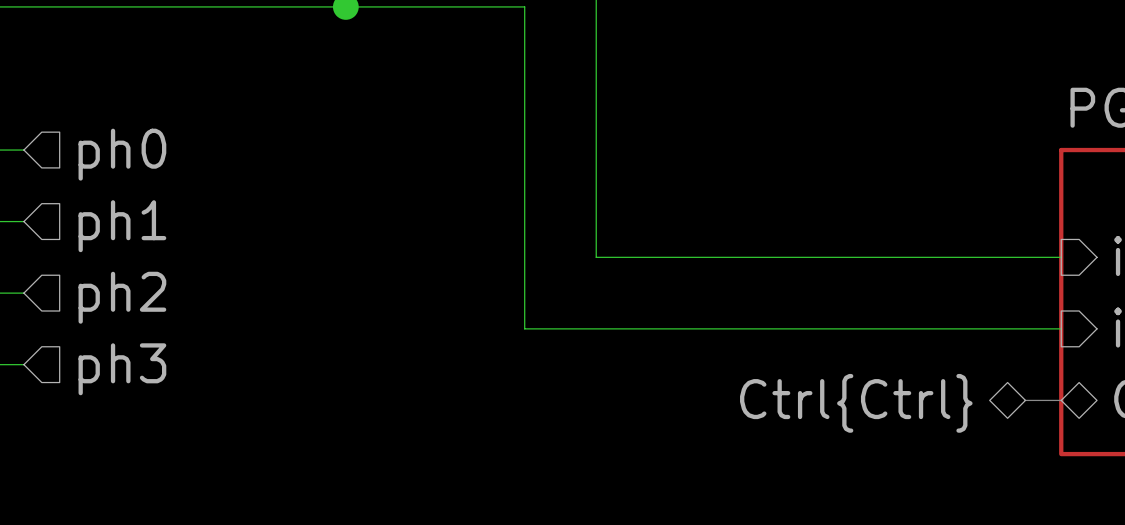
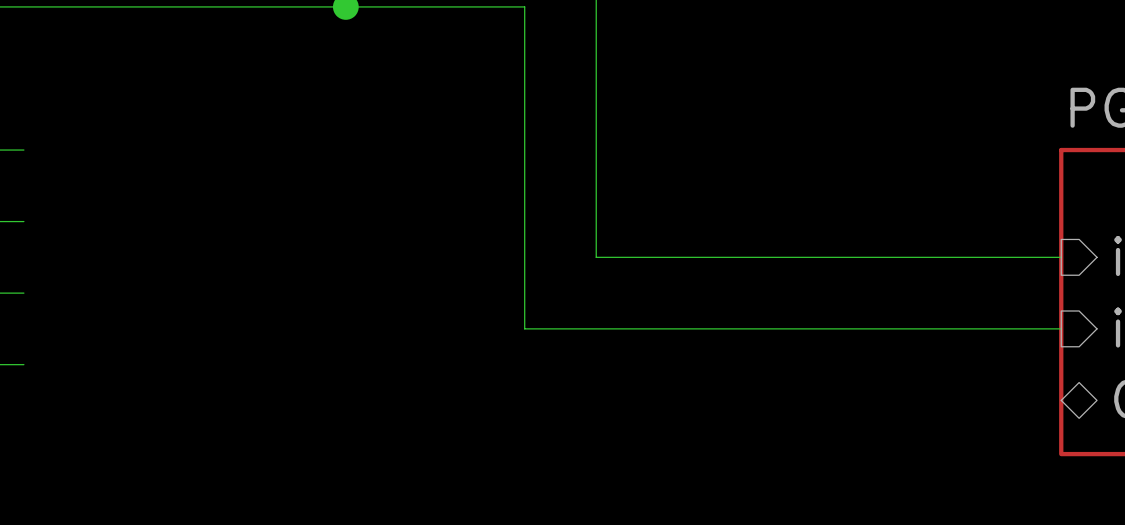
hierarchical label: ph0 (122, 154) -> none
hierarchical label: ph1 (122, 226) -> none
hierarchical label: ph2 (122, 297) -> none
hierarchical label: ph3 (122, 369) -> none
bus: (1025, 400) (1061, 400) -> none
hierarchical label: Ctrl{Ctrl} (856, 403) -> none

